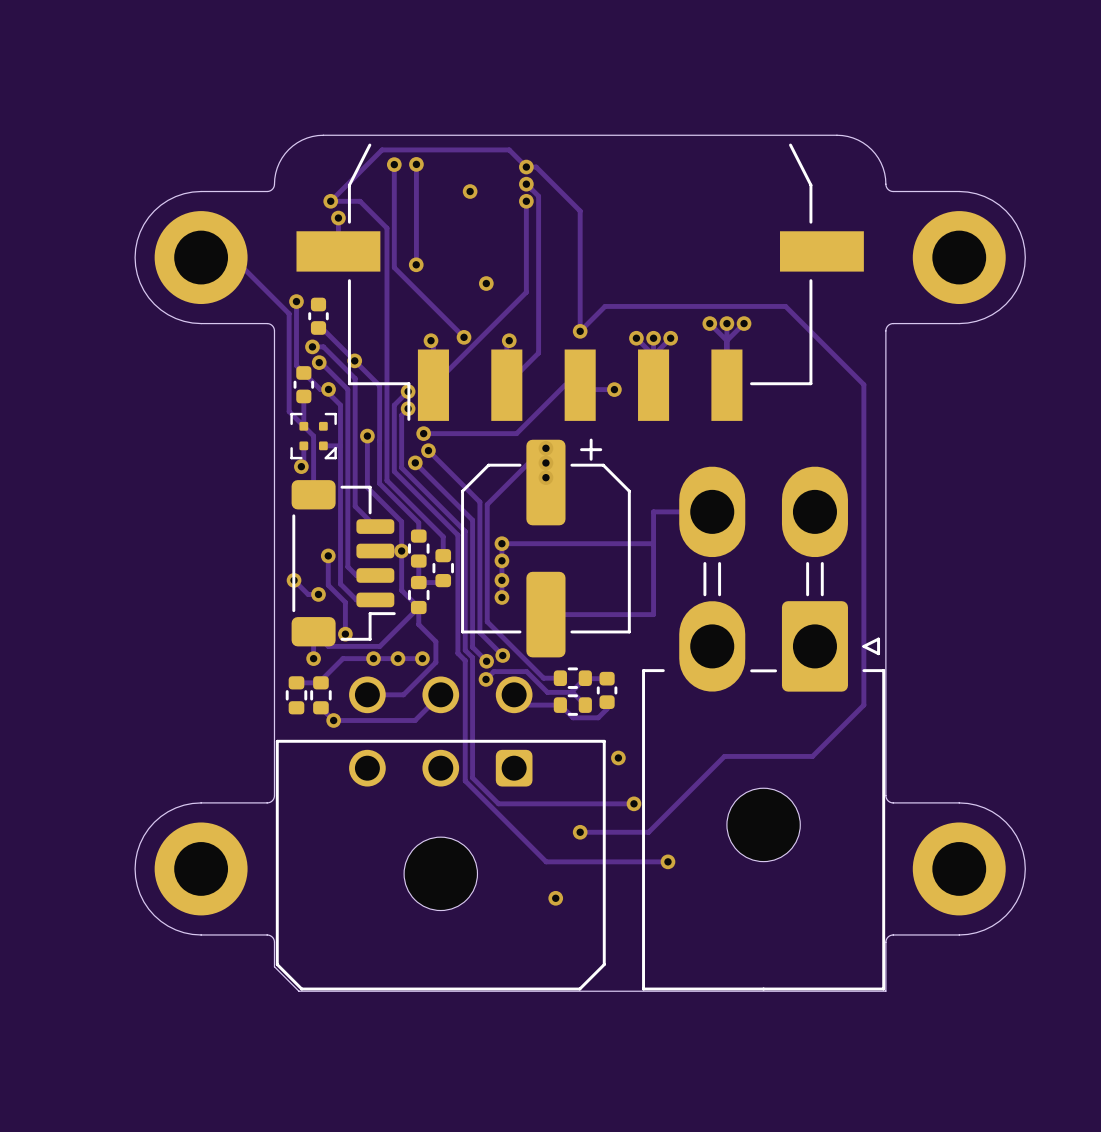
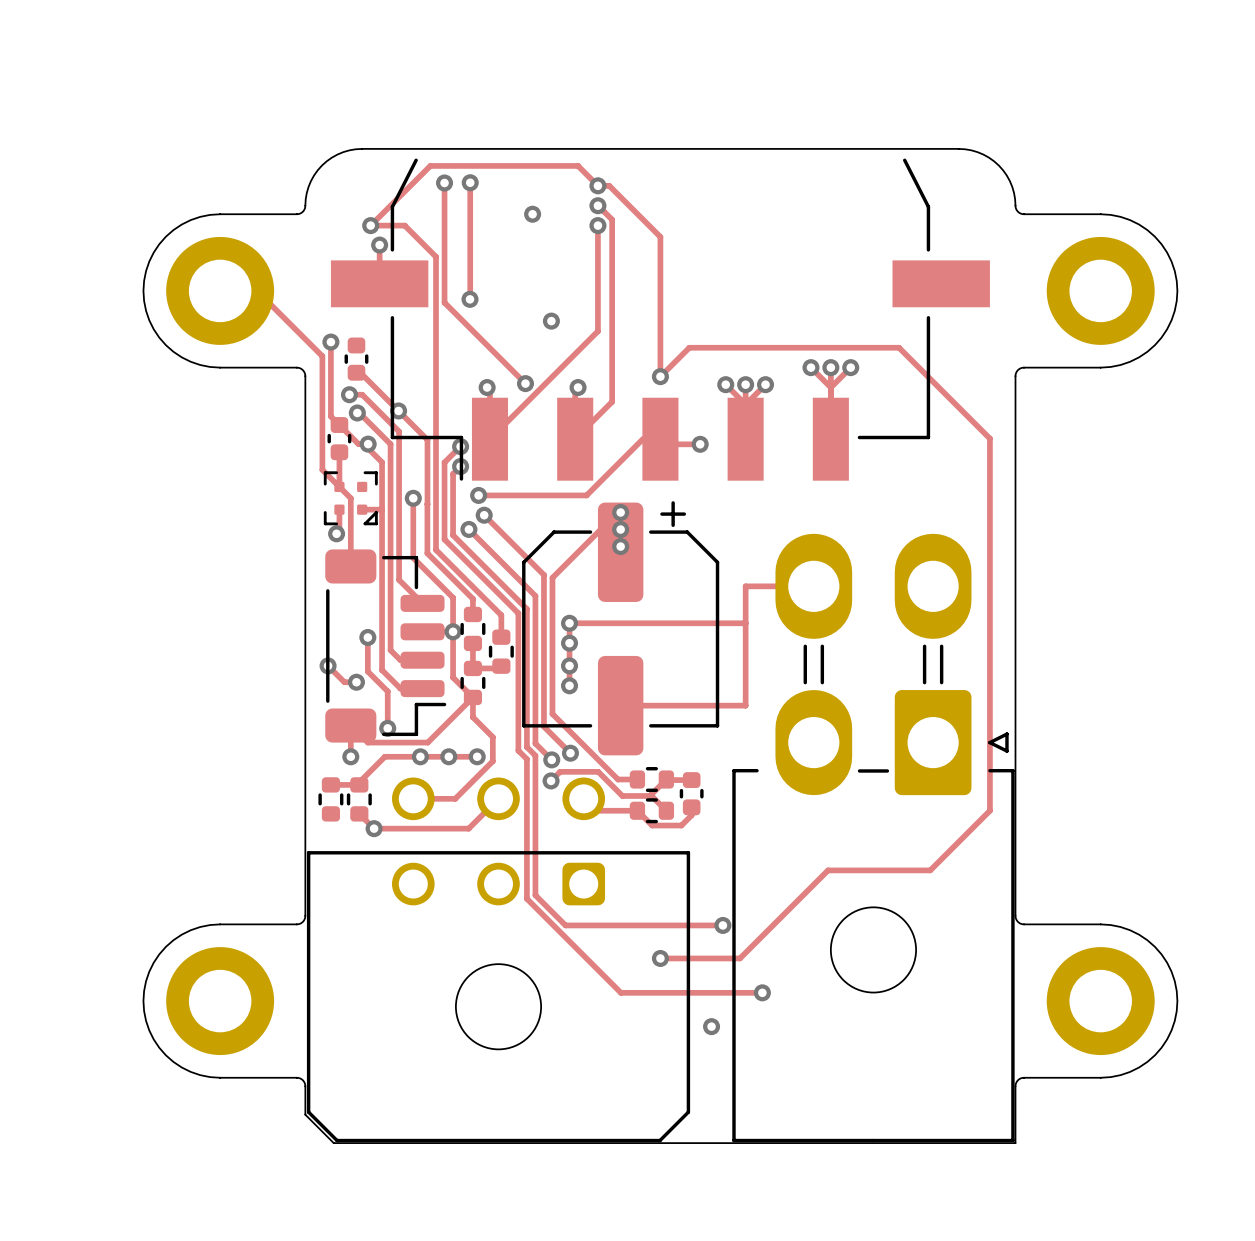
via: (618, 757) -> none
via: none -> (711, 1026)
via: (555, 898) -> none

